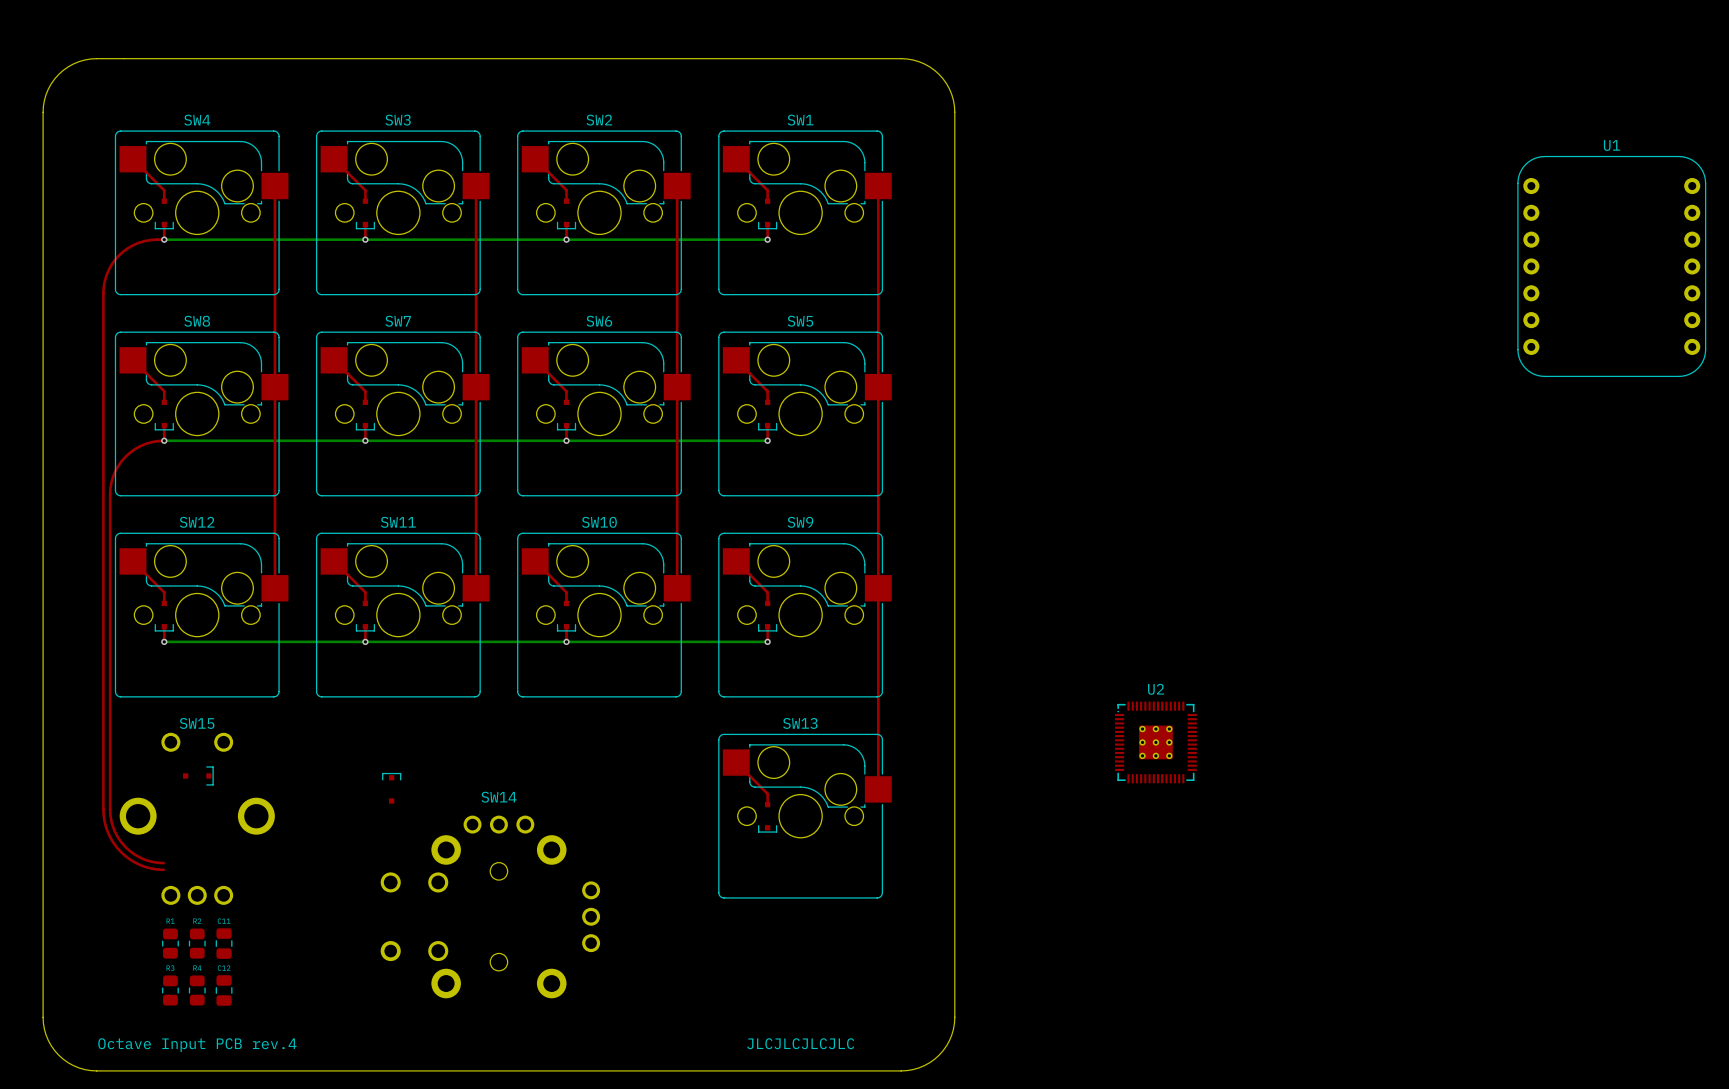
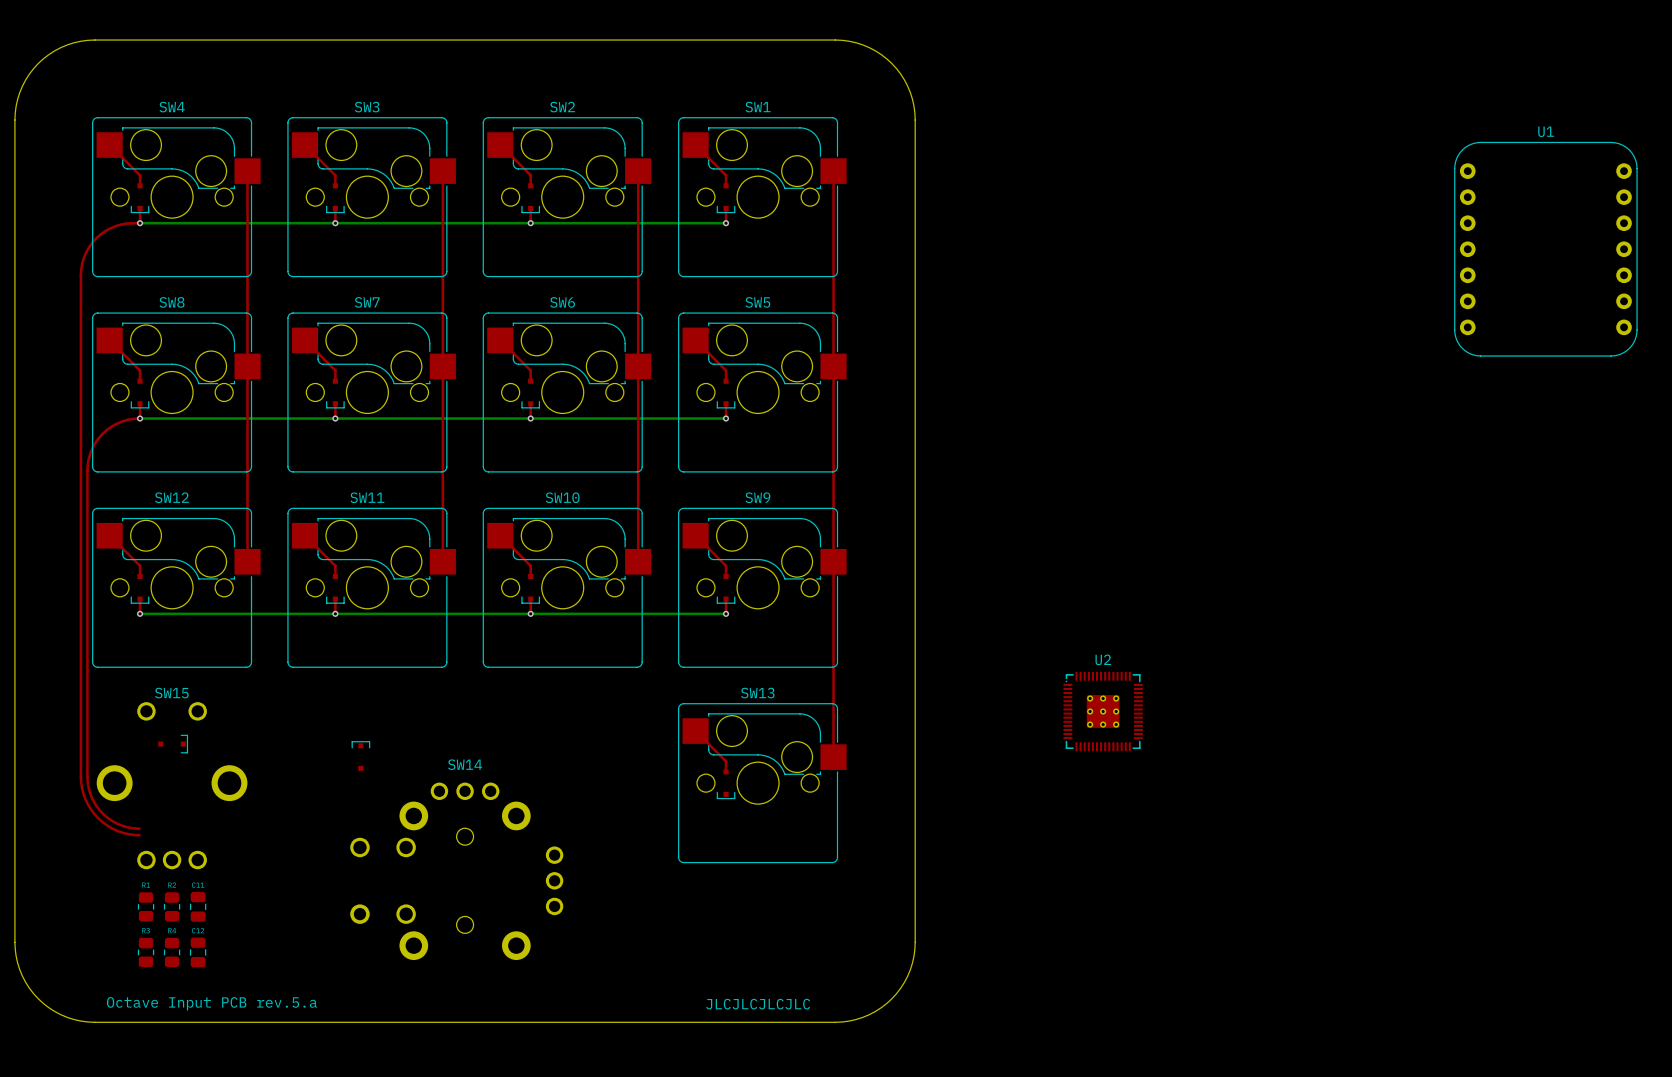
board edge: (96, 58) (901, 58) (924, 63) (943, 78) (951, 94) (954, 112) (954, 1017) (949, 1040) (934, 1059) (918, 1067) (901, 1070) (96, 1070) (73, 1065) (54, 1050) (46, 1035) (43, 1017) (43, 112) (46, 94) (58, 74) (78, 61) (96, 58) -> (94, 40) (67, 44) (43, 58) (33, 68) (22, 86) (15, 113) (14, 942) (19, 969) (33, 993) (49, 1007) (61, 1014) (81, 1021) (94, 1022) (835, 1022) (862, 1017) (886, 1003) (900, 988) (907, 976) (912, 963) (915, 942) (915, 119) (910, 92) (896, 68) (886, 58) (869, 47) (855, 42) (835, 40) (94, 40)
text: Octave Input PCB rev.4 (197, 1045) -> Octave Input PCB rev.5.a (212, 1003)

